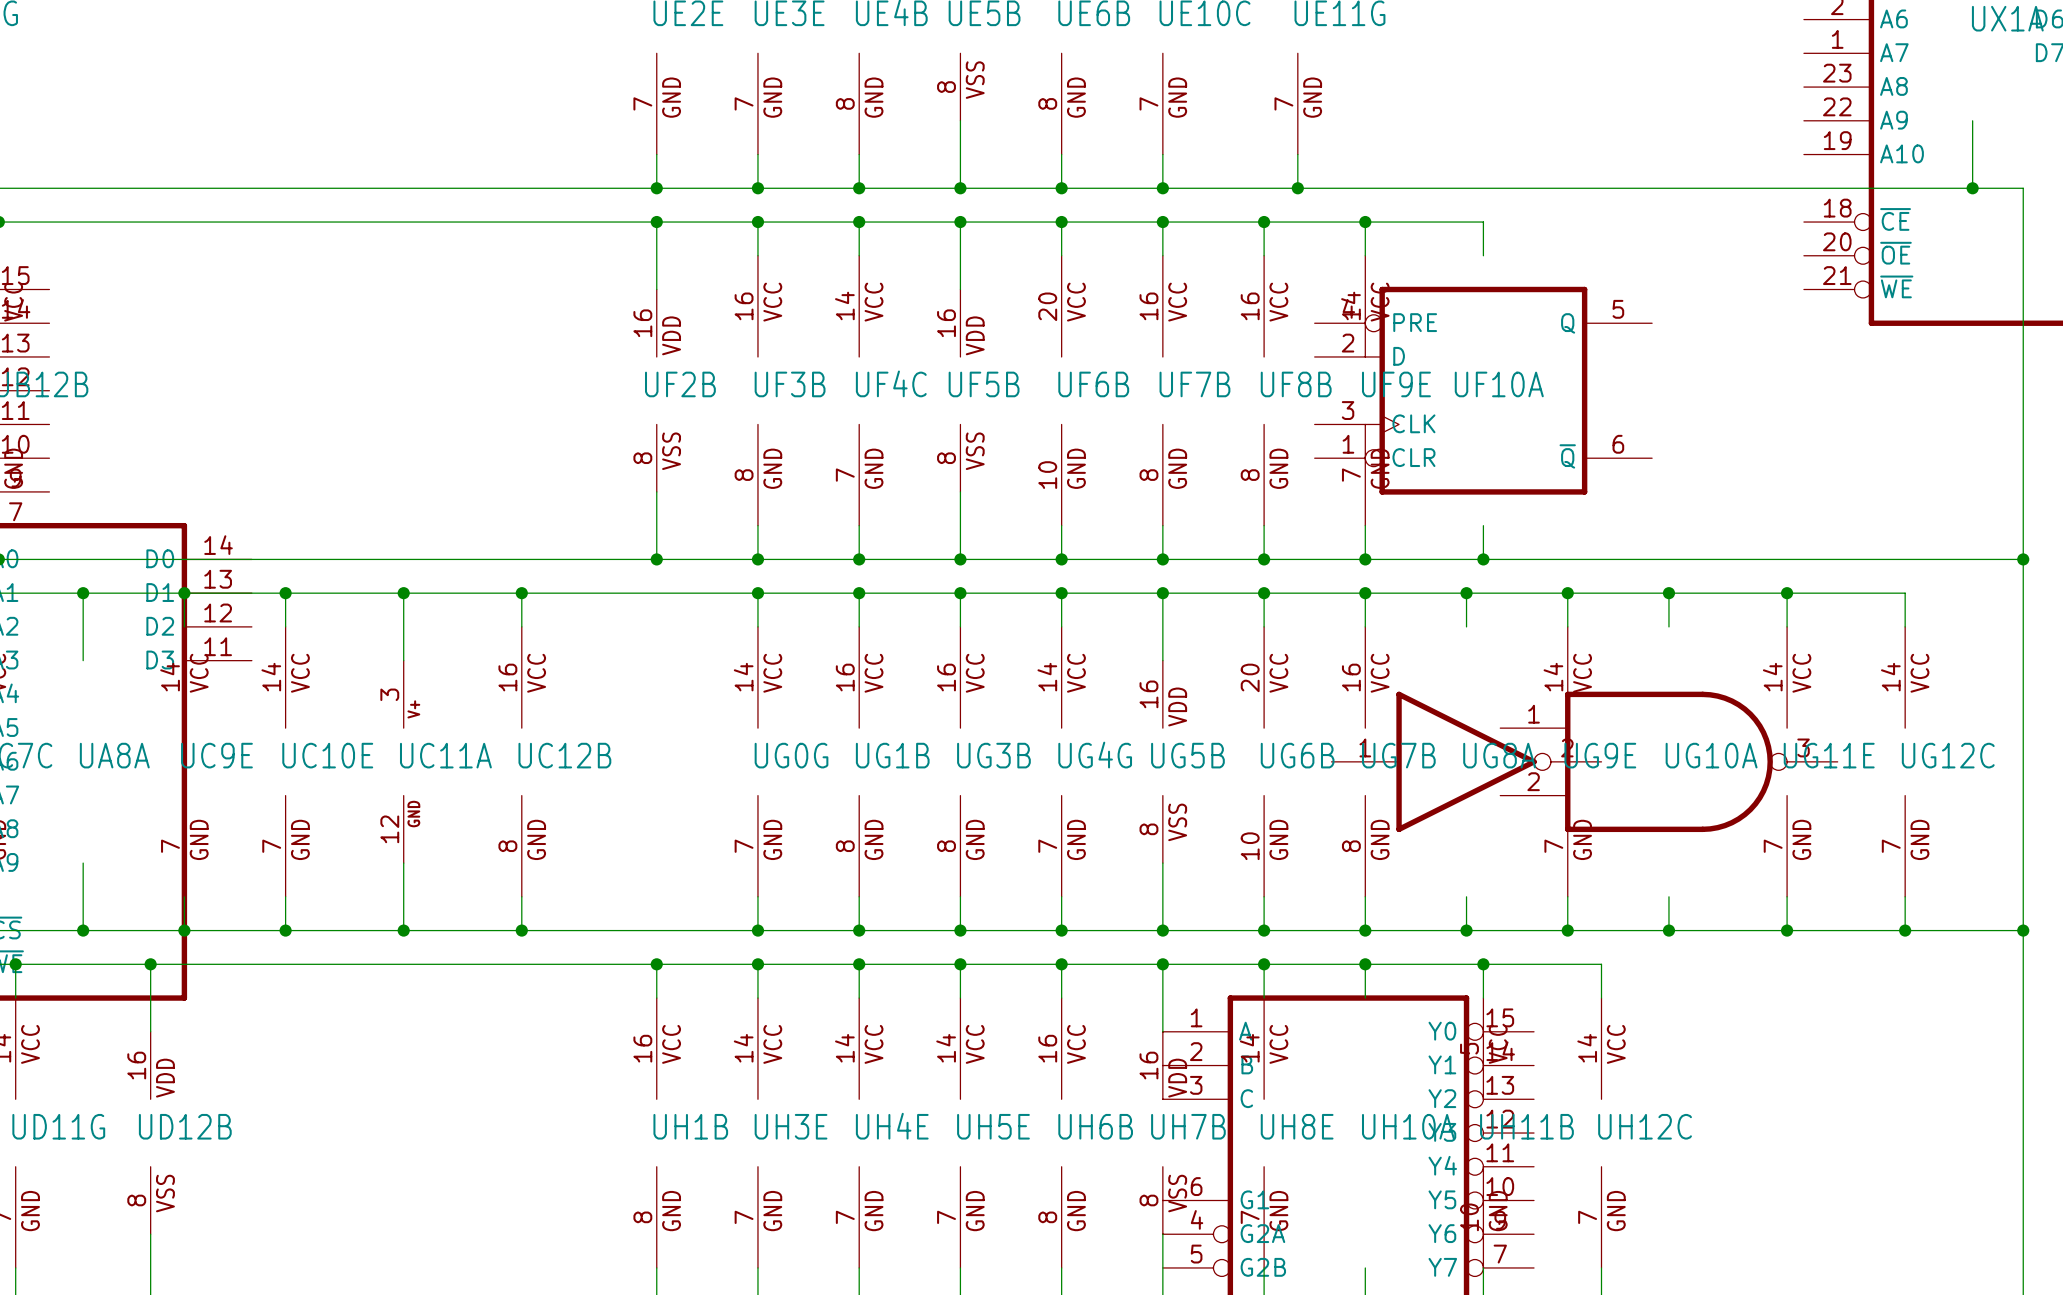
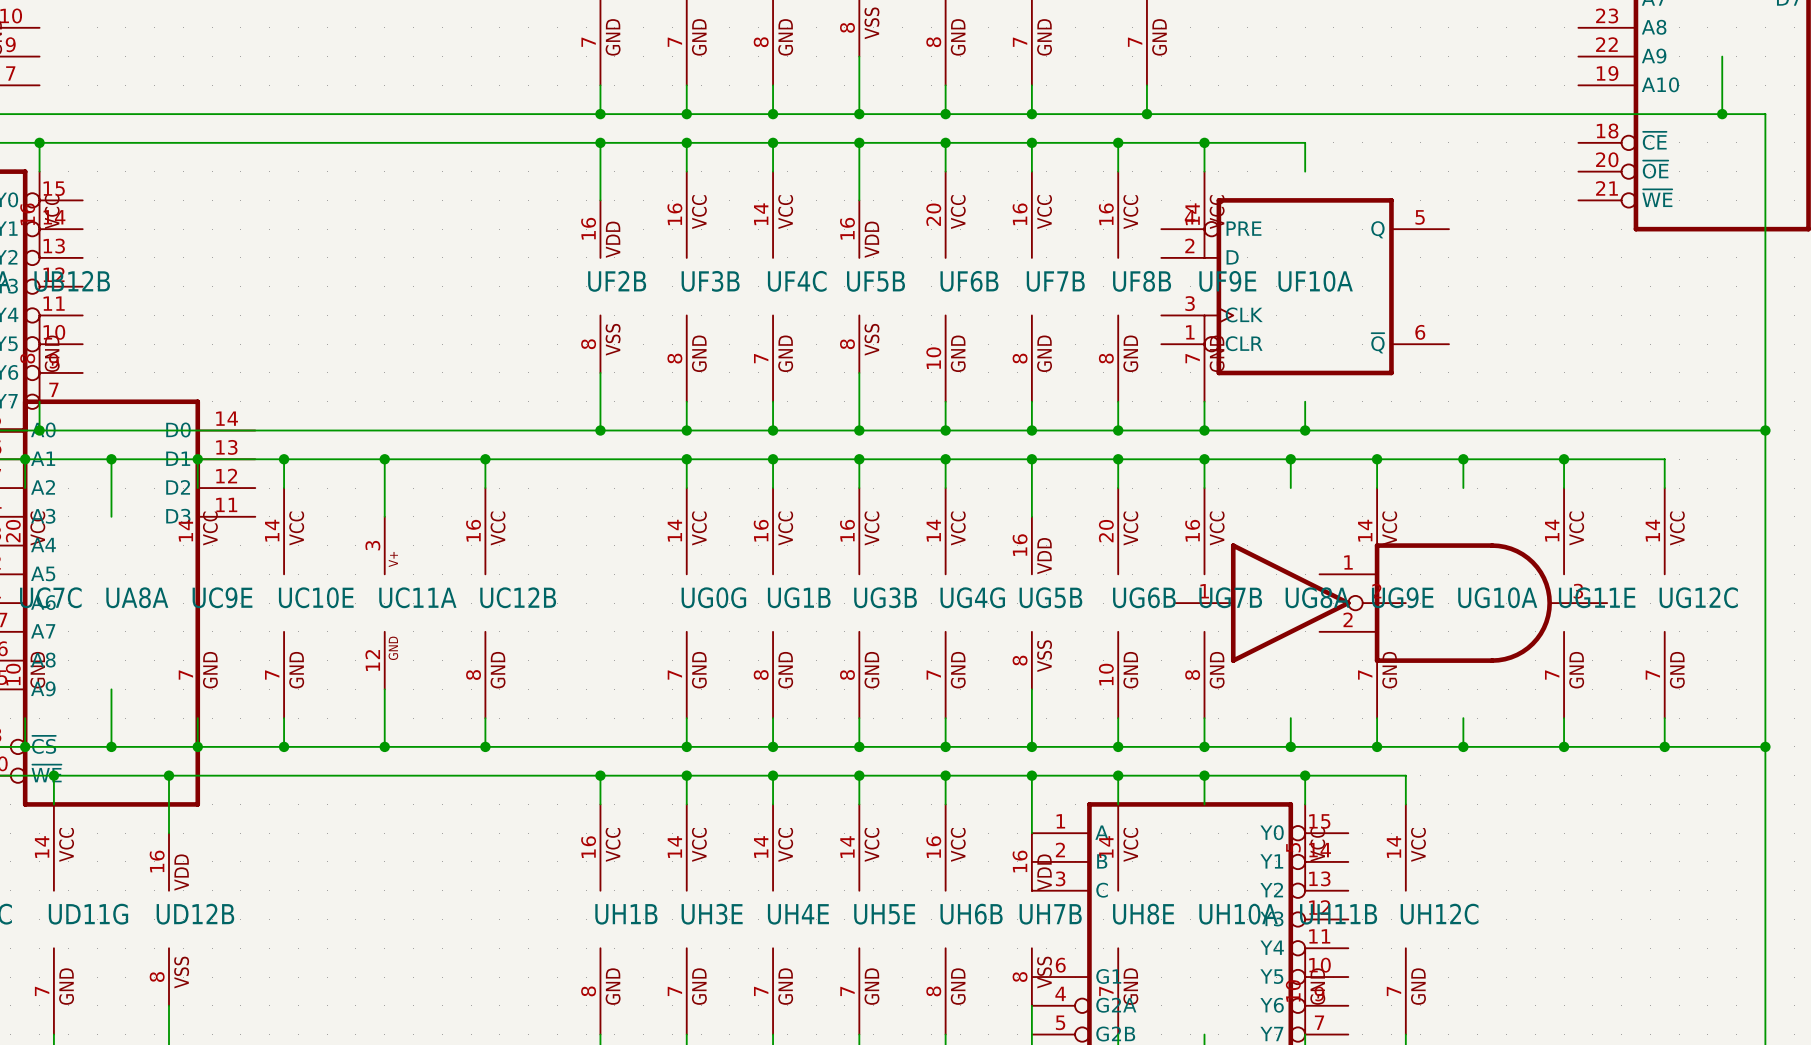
UG10A symbol: [1500, 691, 1838, 833] -> [1319, 543, 1608, 663]

